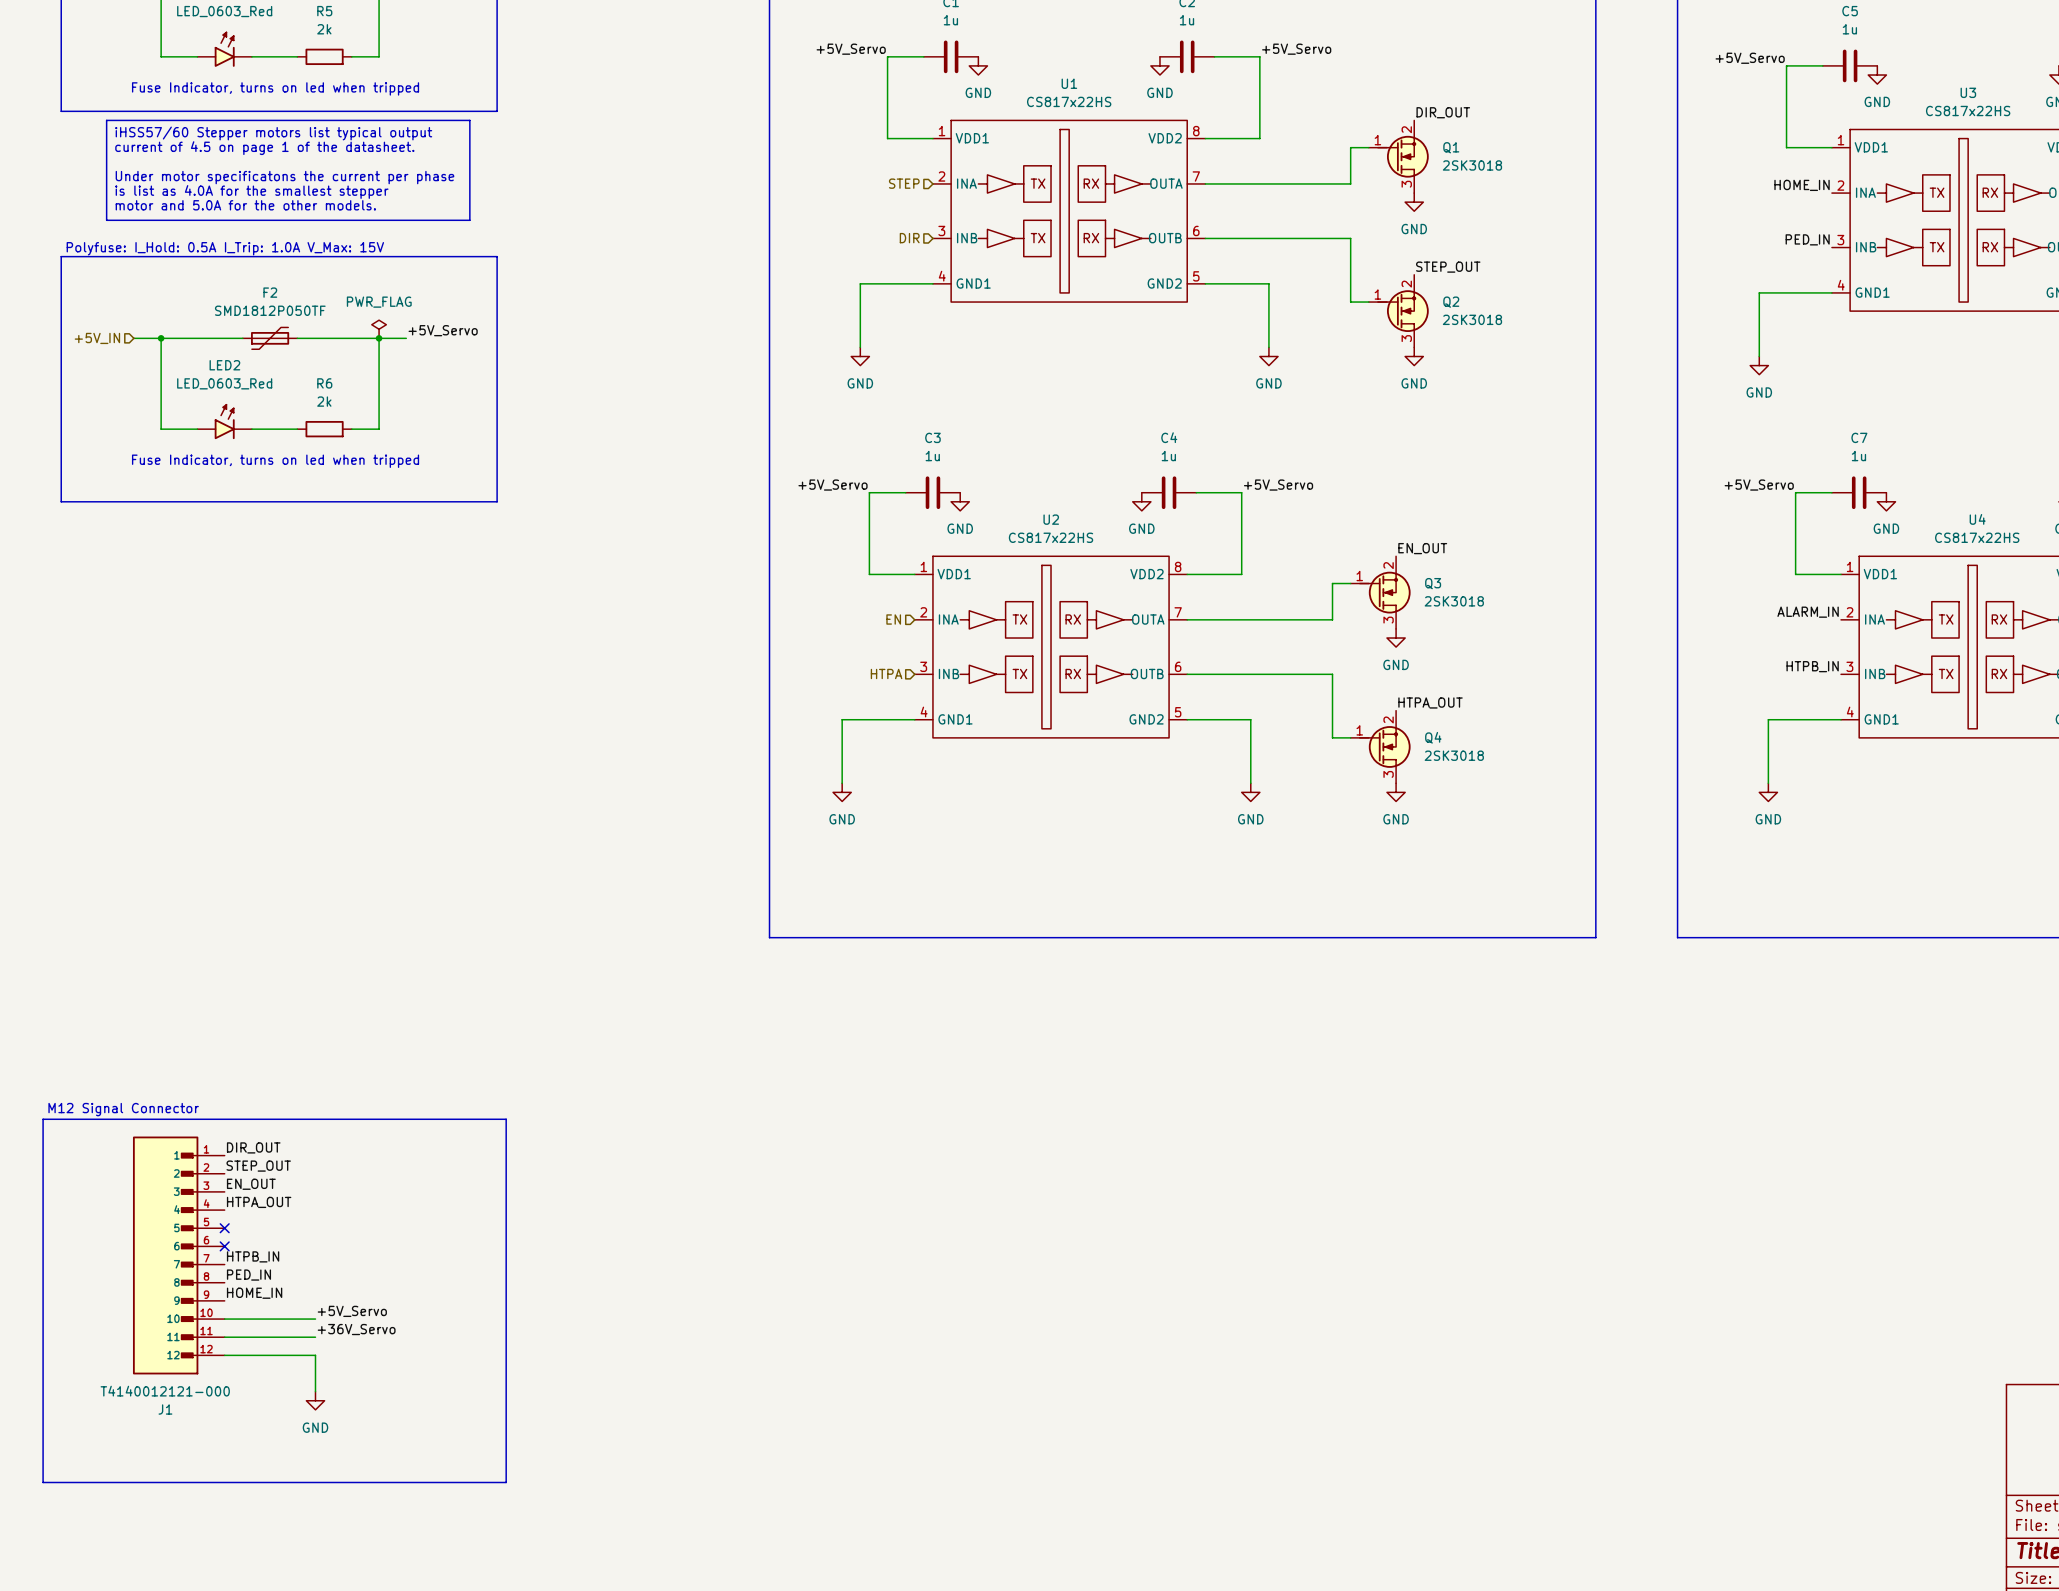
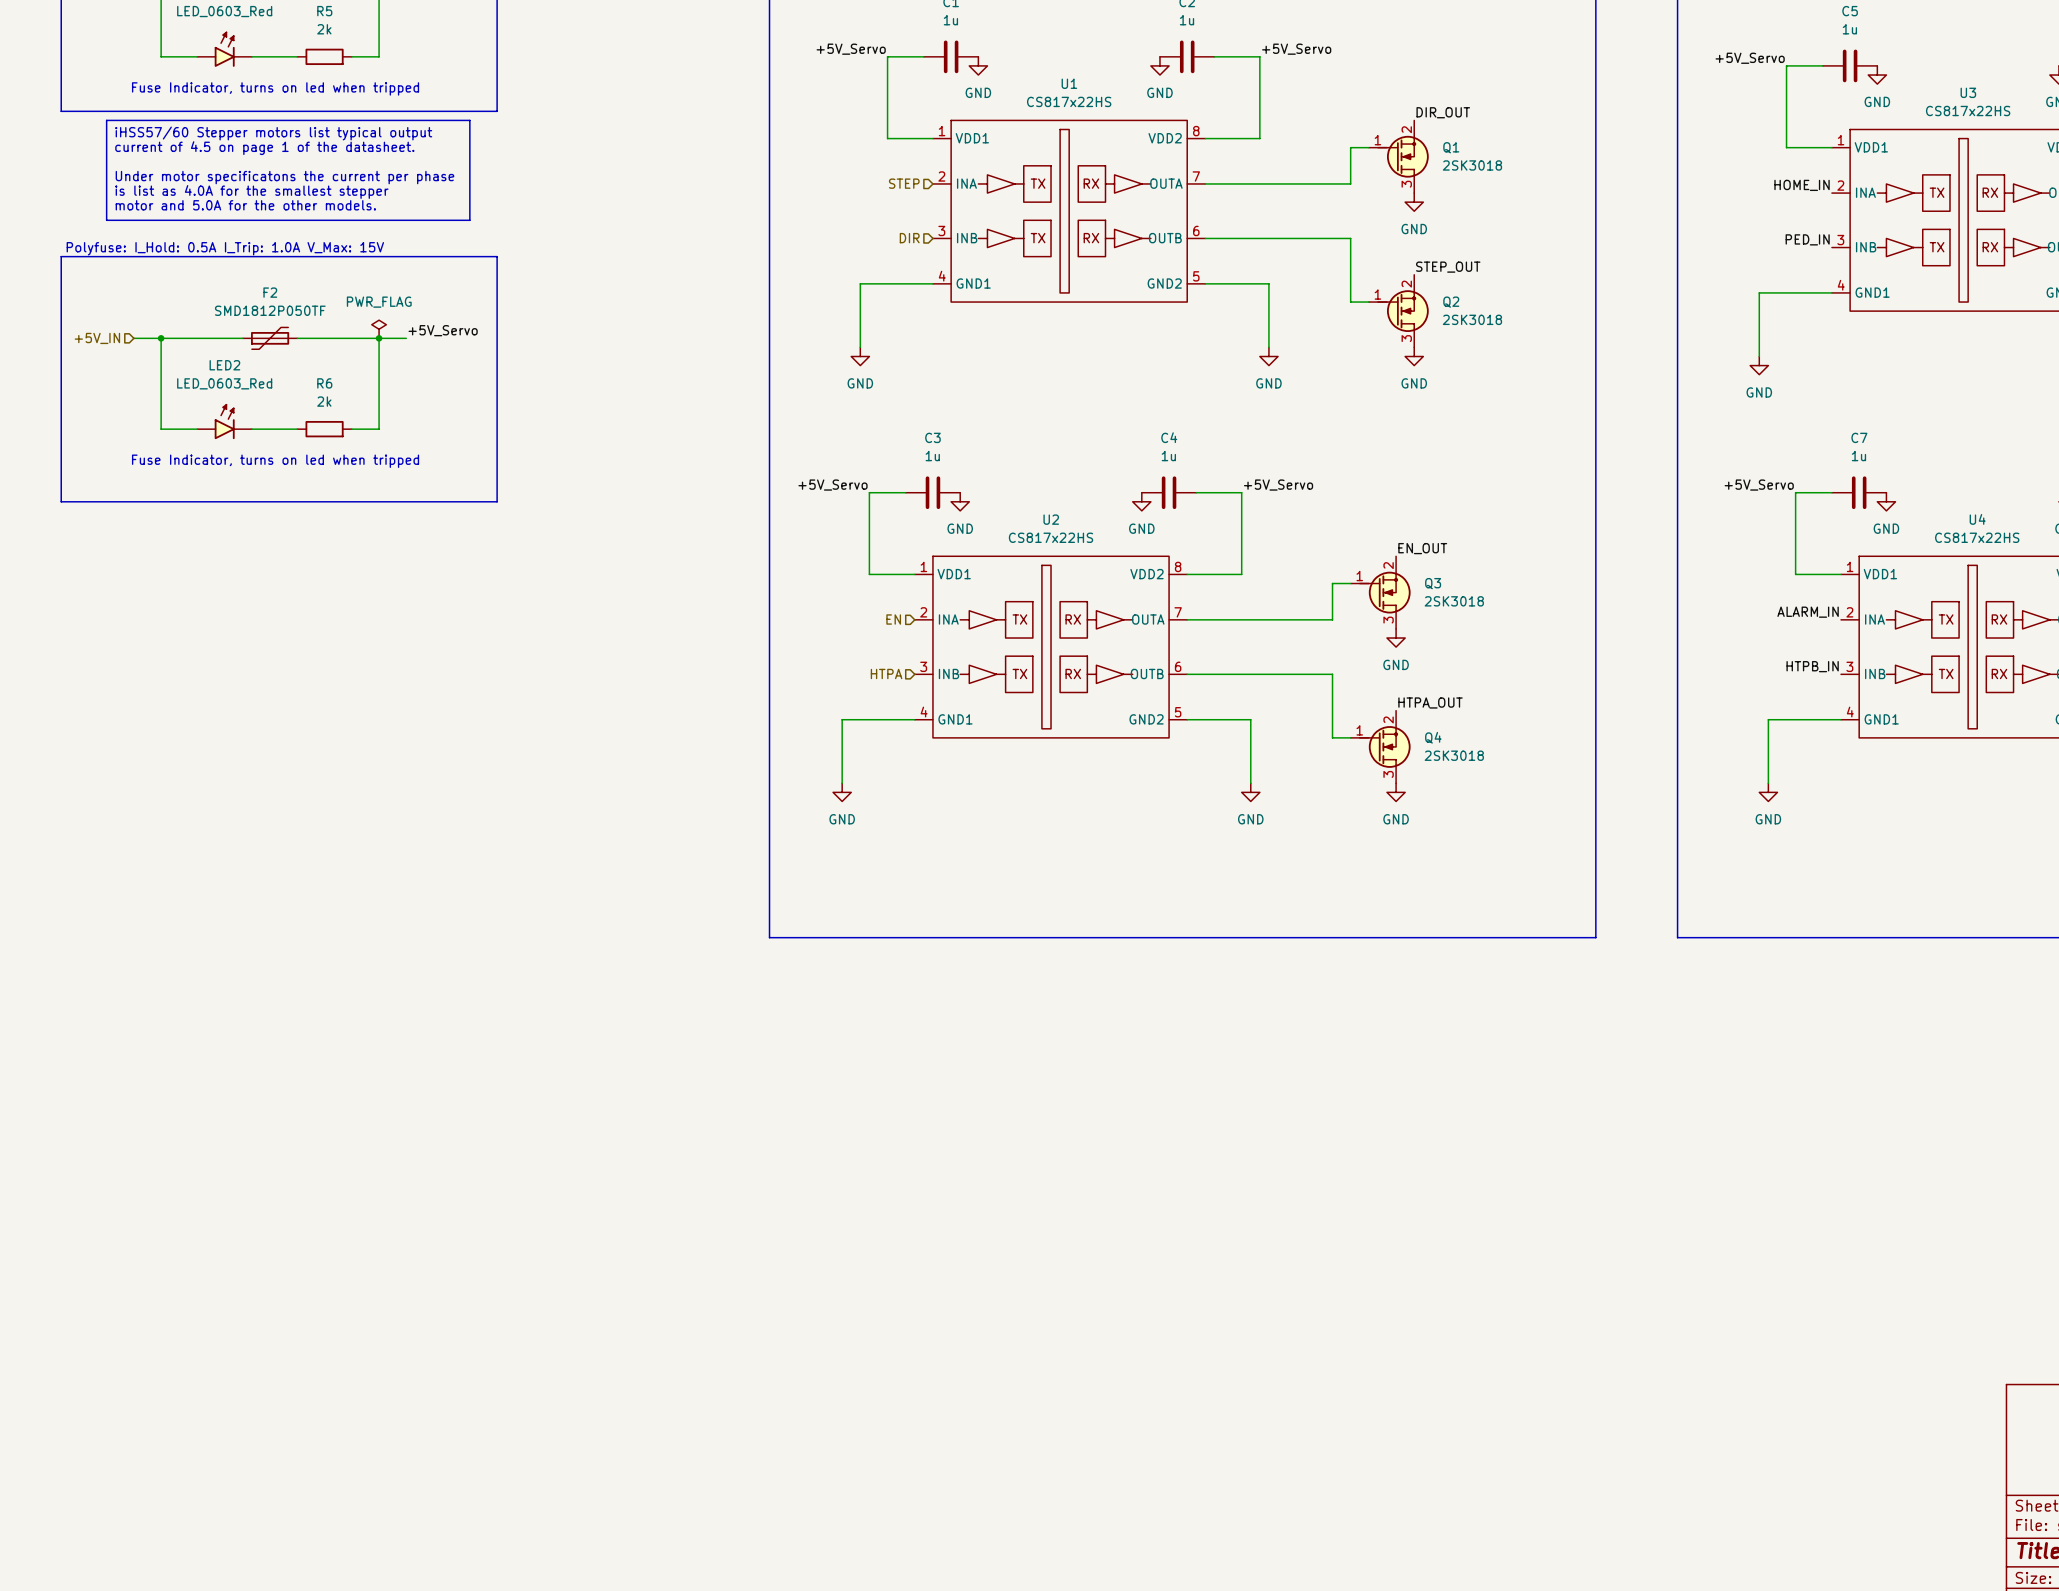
text: M12 Signal Connector (123, 1109) -> none
line: (43, 1119) (506, 1119) (506, 1482) (43, 1482) (43, 1119) -> none
label: DIR_OUT (253, 1147) -> none
label: STEP_OUT (258, 1166) -> none
label: EN_OUT (251, 1184) -> none
label: HTPA_OUT (259, 1202) -> none
no-connect mark: (224, 1228) -> none
no-connect mark: (224, 1246) -> none
J1: T4140012121-000 (178, 1255) -> none
label: HTPB_IN (253, 1256) -> none
label: PED_IN (248, 1275) -> none
label: HOME_IN (254, 1293) -> none
label: +5V_Servo (352, 1311) -> none
wire: (224, 1319) (315, 1319) -> none
label: +36V_Servo (356, 1329) -> none
wire: (224, 1337) (315, 1337) -> none
wire: (224, 1355) (315, 1355) (315, 1391) -> none
power symbol: GND (315, 1400) -> none

